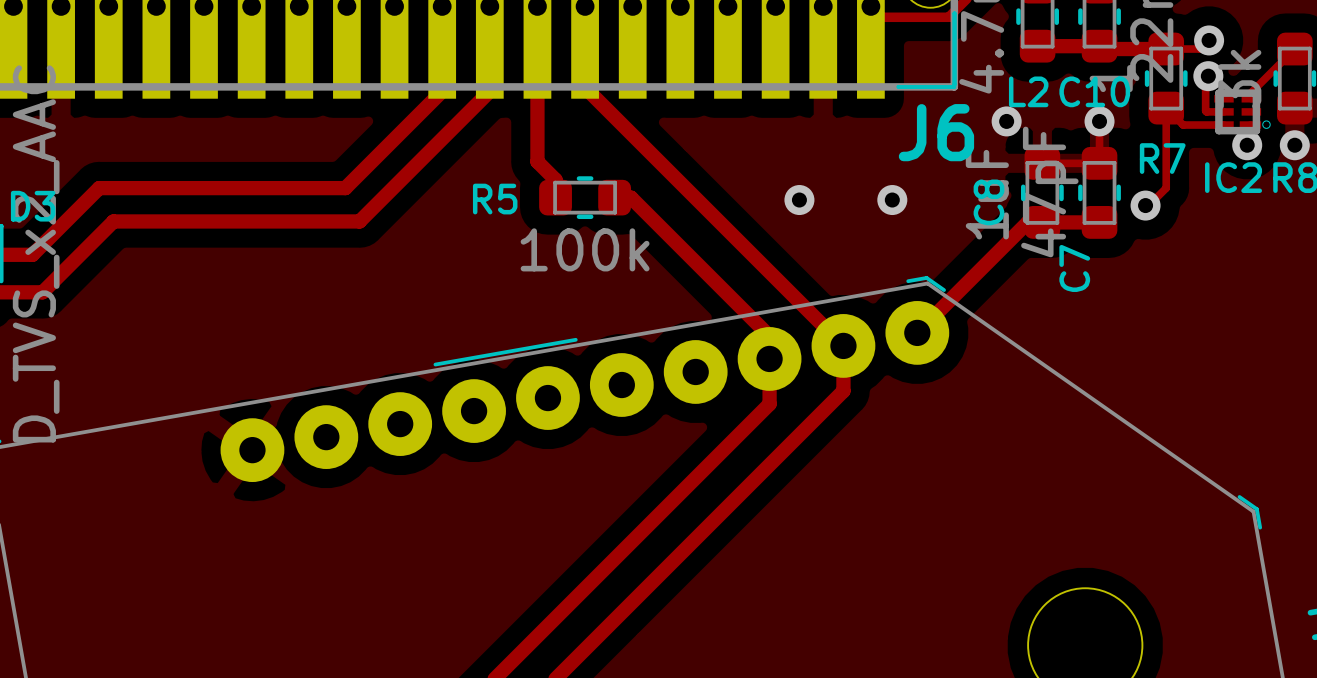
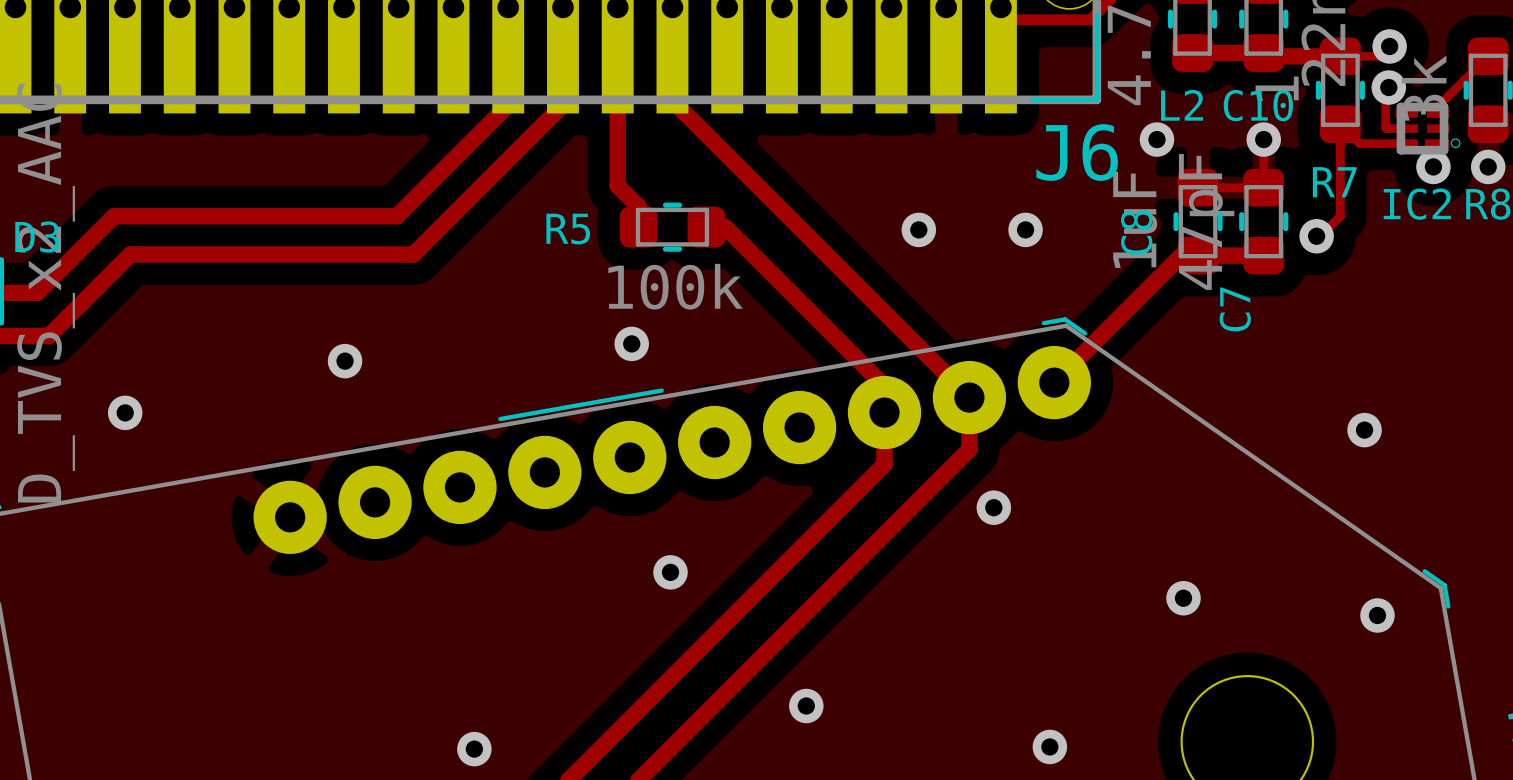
via: none -> (631, 343)
via: none -> (345, 361)
via: none -> (125, 412)
via: none -> (1364, 430)
via: none -> (993, 507)
via: none -> (670, 572)
via: none -> (1183, 598)
via: none -> (1377, 615)
via: none -> (806, 706)
via: none -> (1049, 746)
via: none -> (474, 749)

